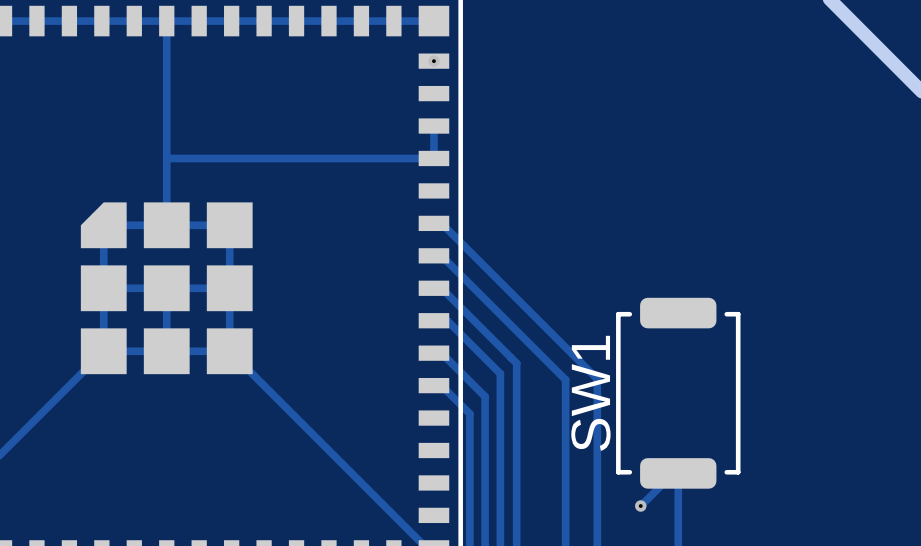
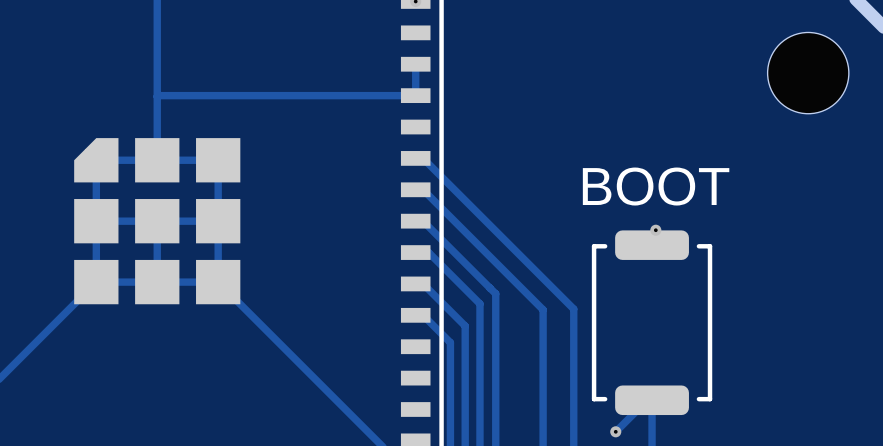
part: none -> (808, 73)
text: none -> BOOT (656, 186)
via: none -> (655, 230)
SW1 name: SW1 (590, 393) -> none

